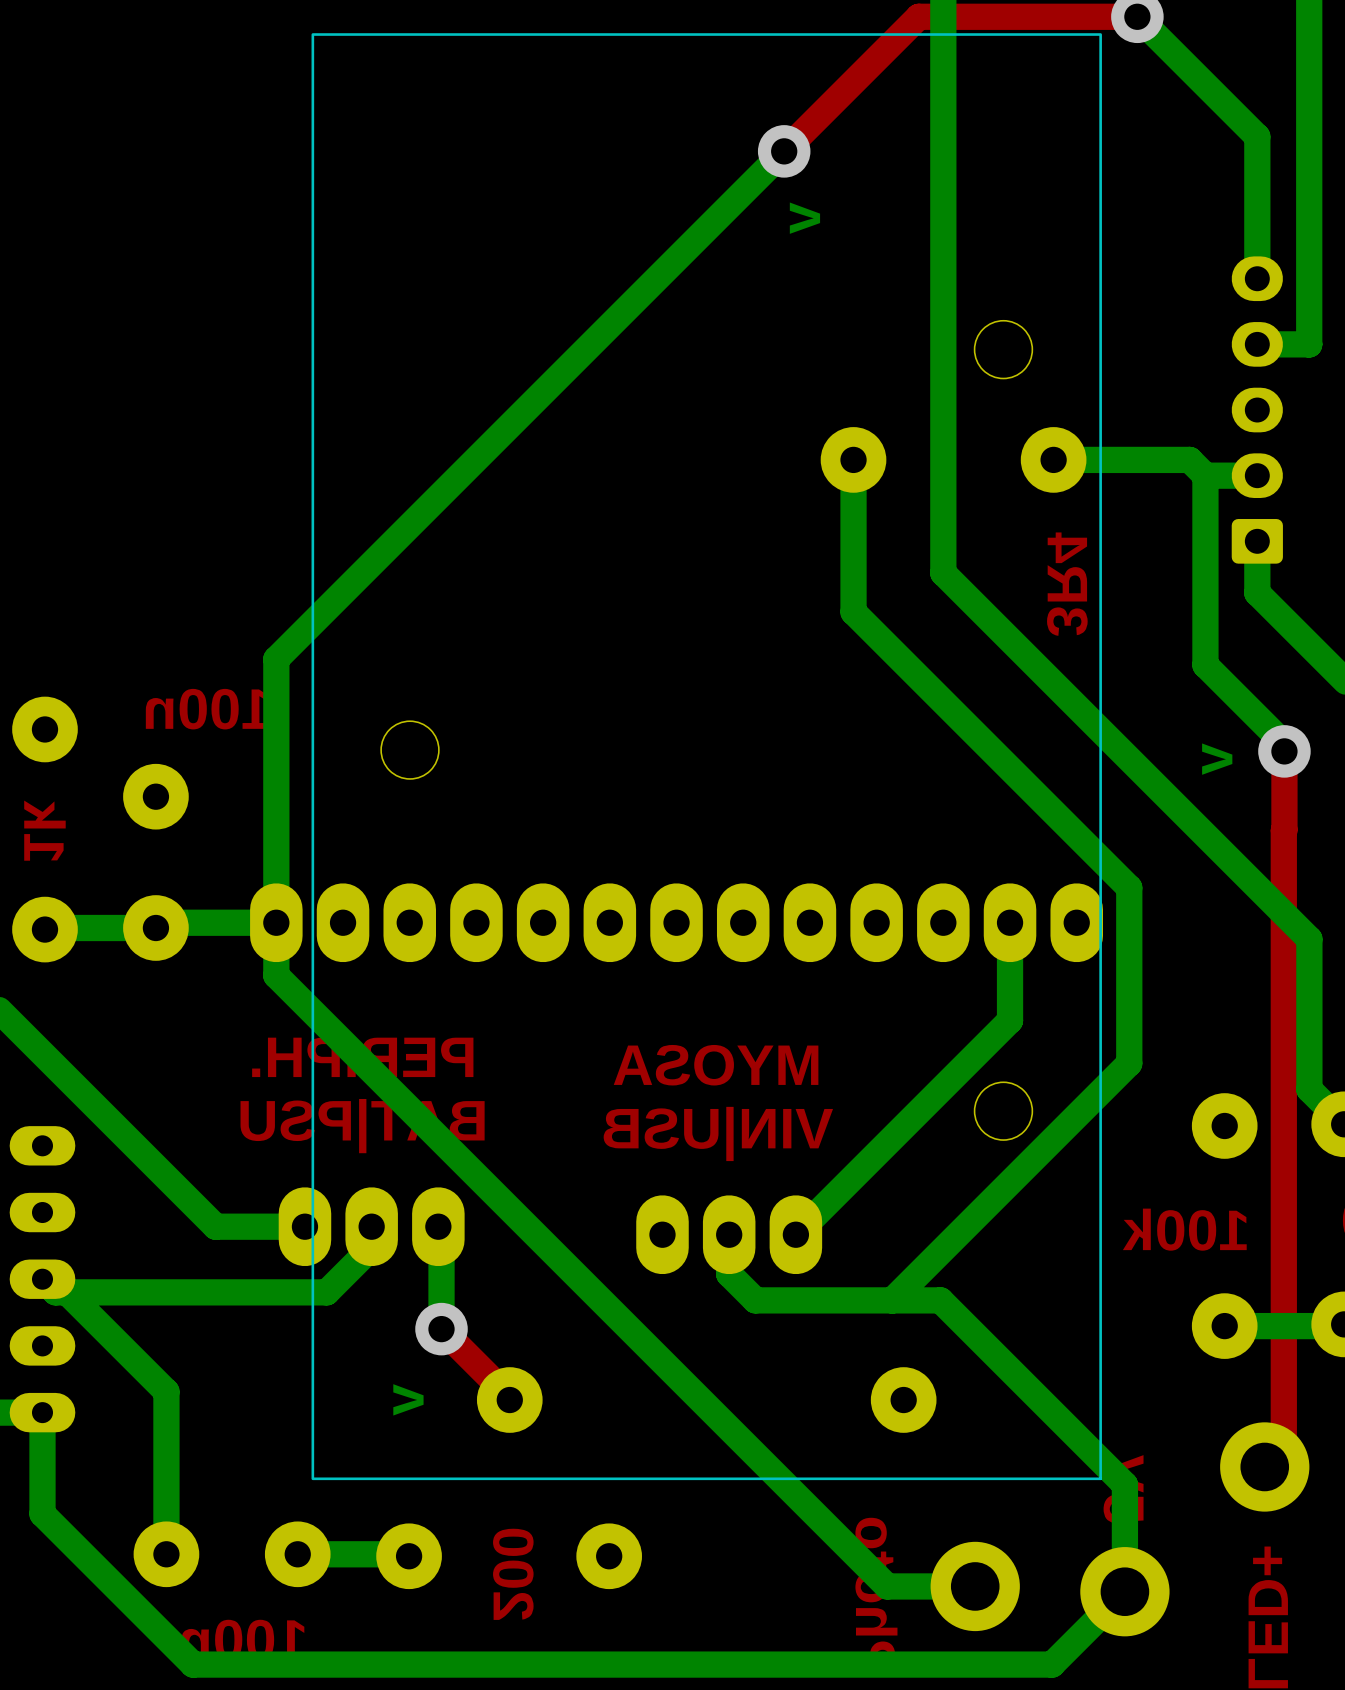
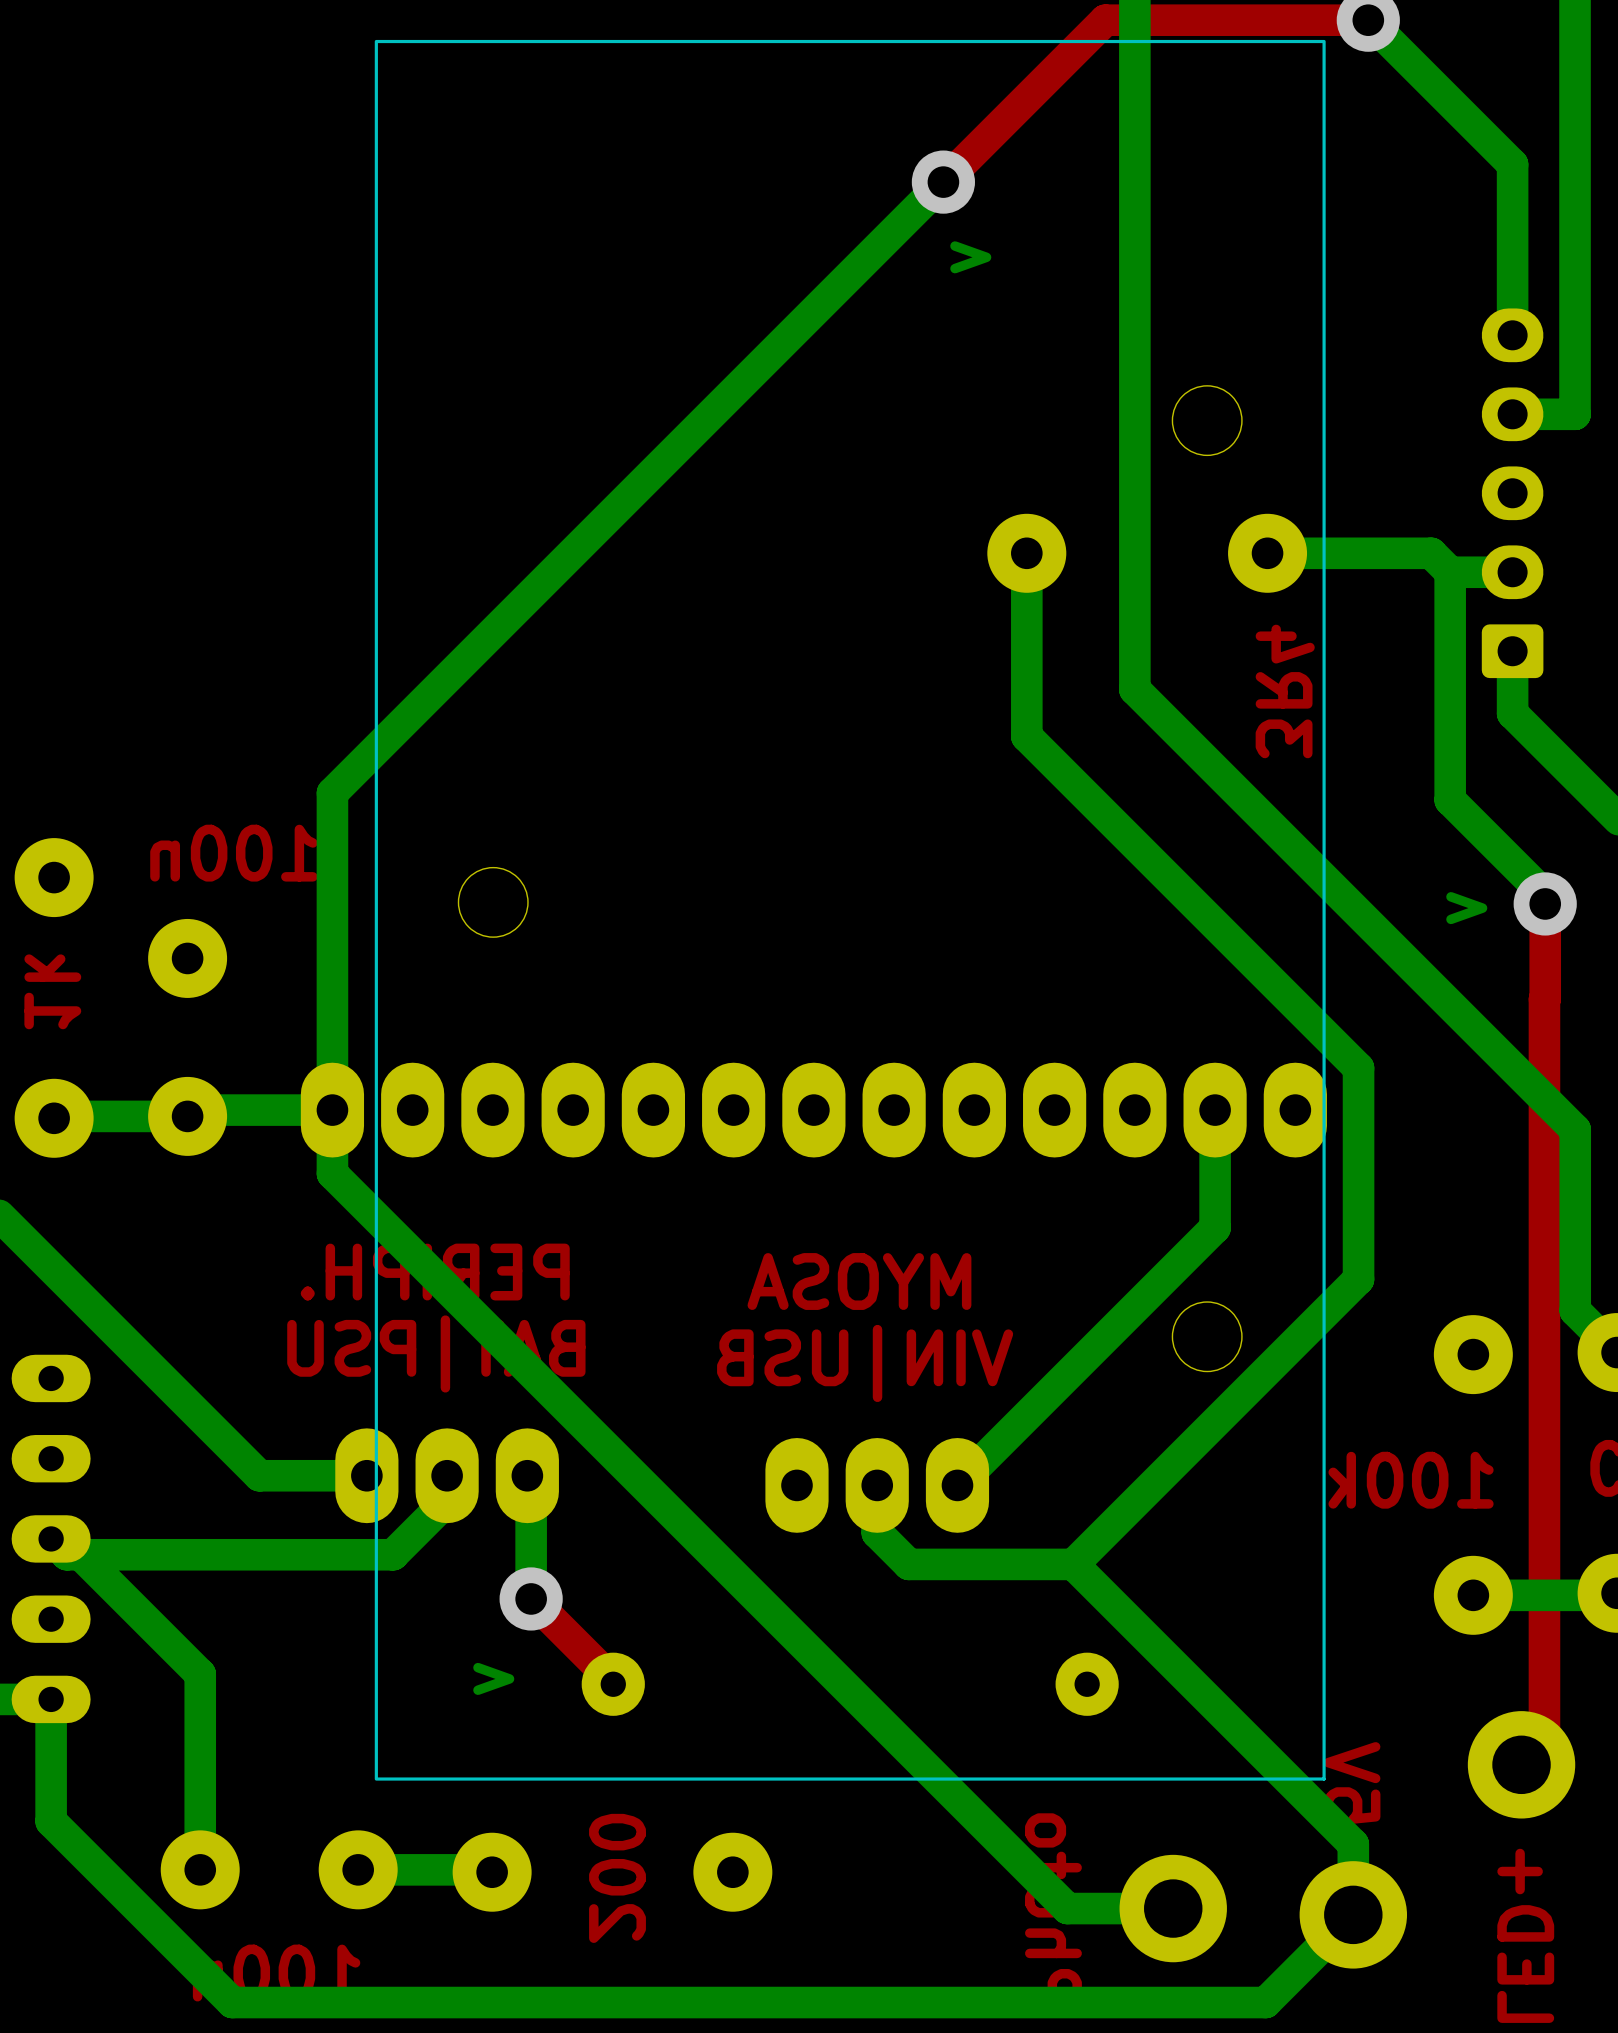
part footprint: [311, 33, 1102, 1481] -> [374, 39, 1326, 1781]
bottom track: (892, 1300) (940, 1300) (1124, 1484) (1124, 1533) -> (1073, 1564) (1353, 1844)

